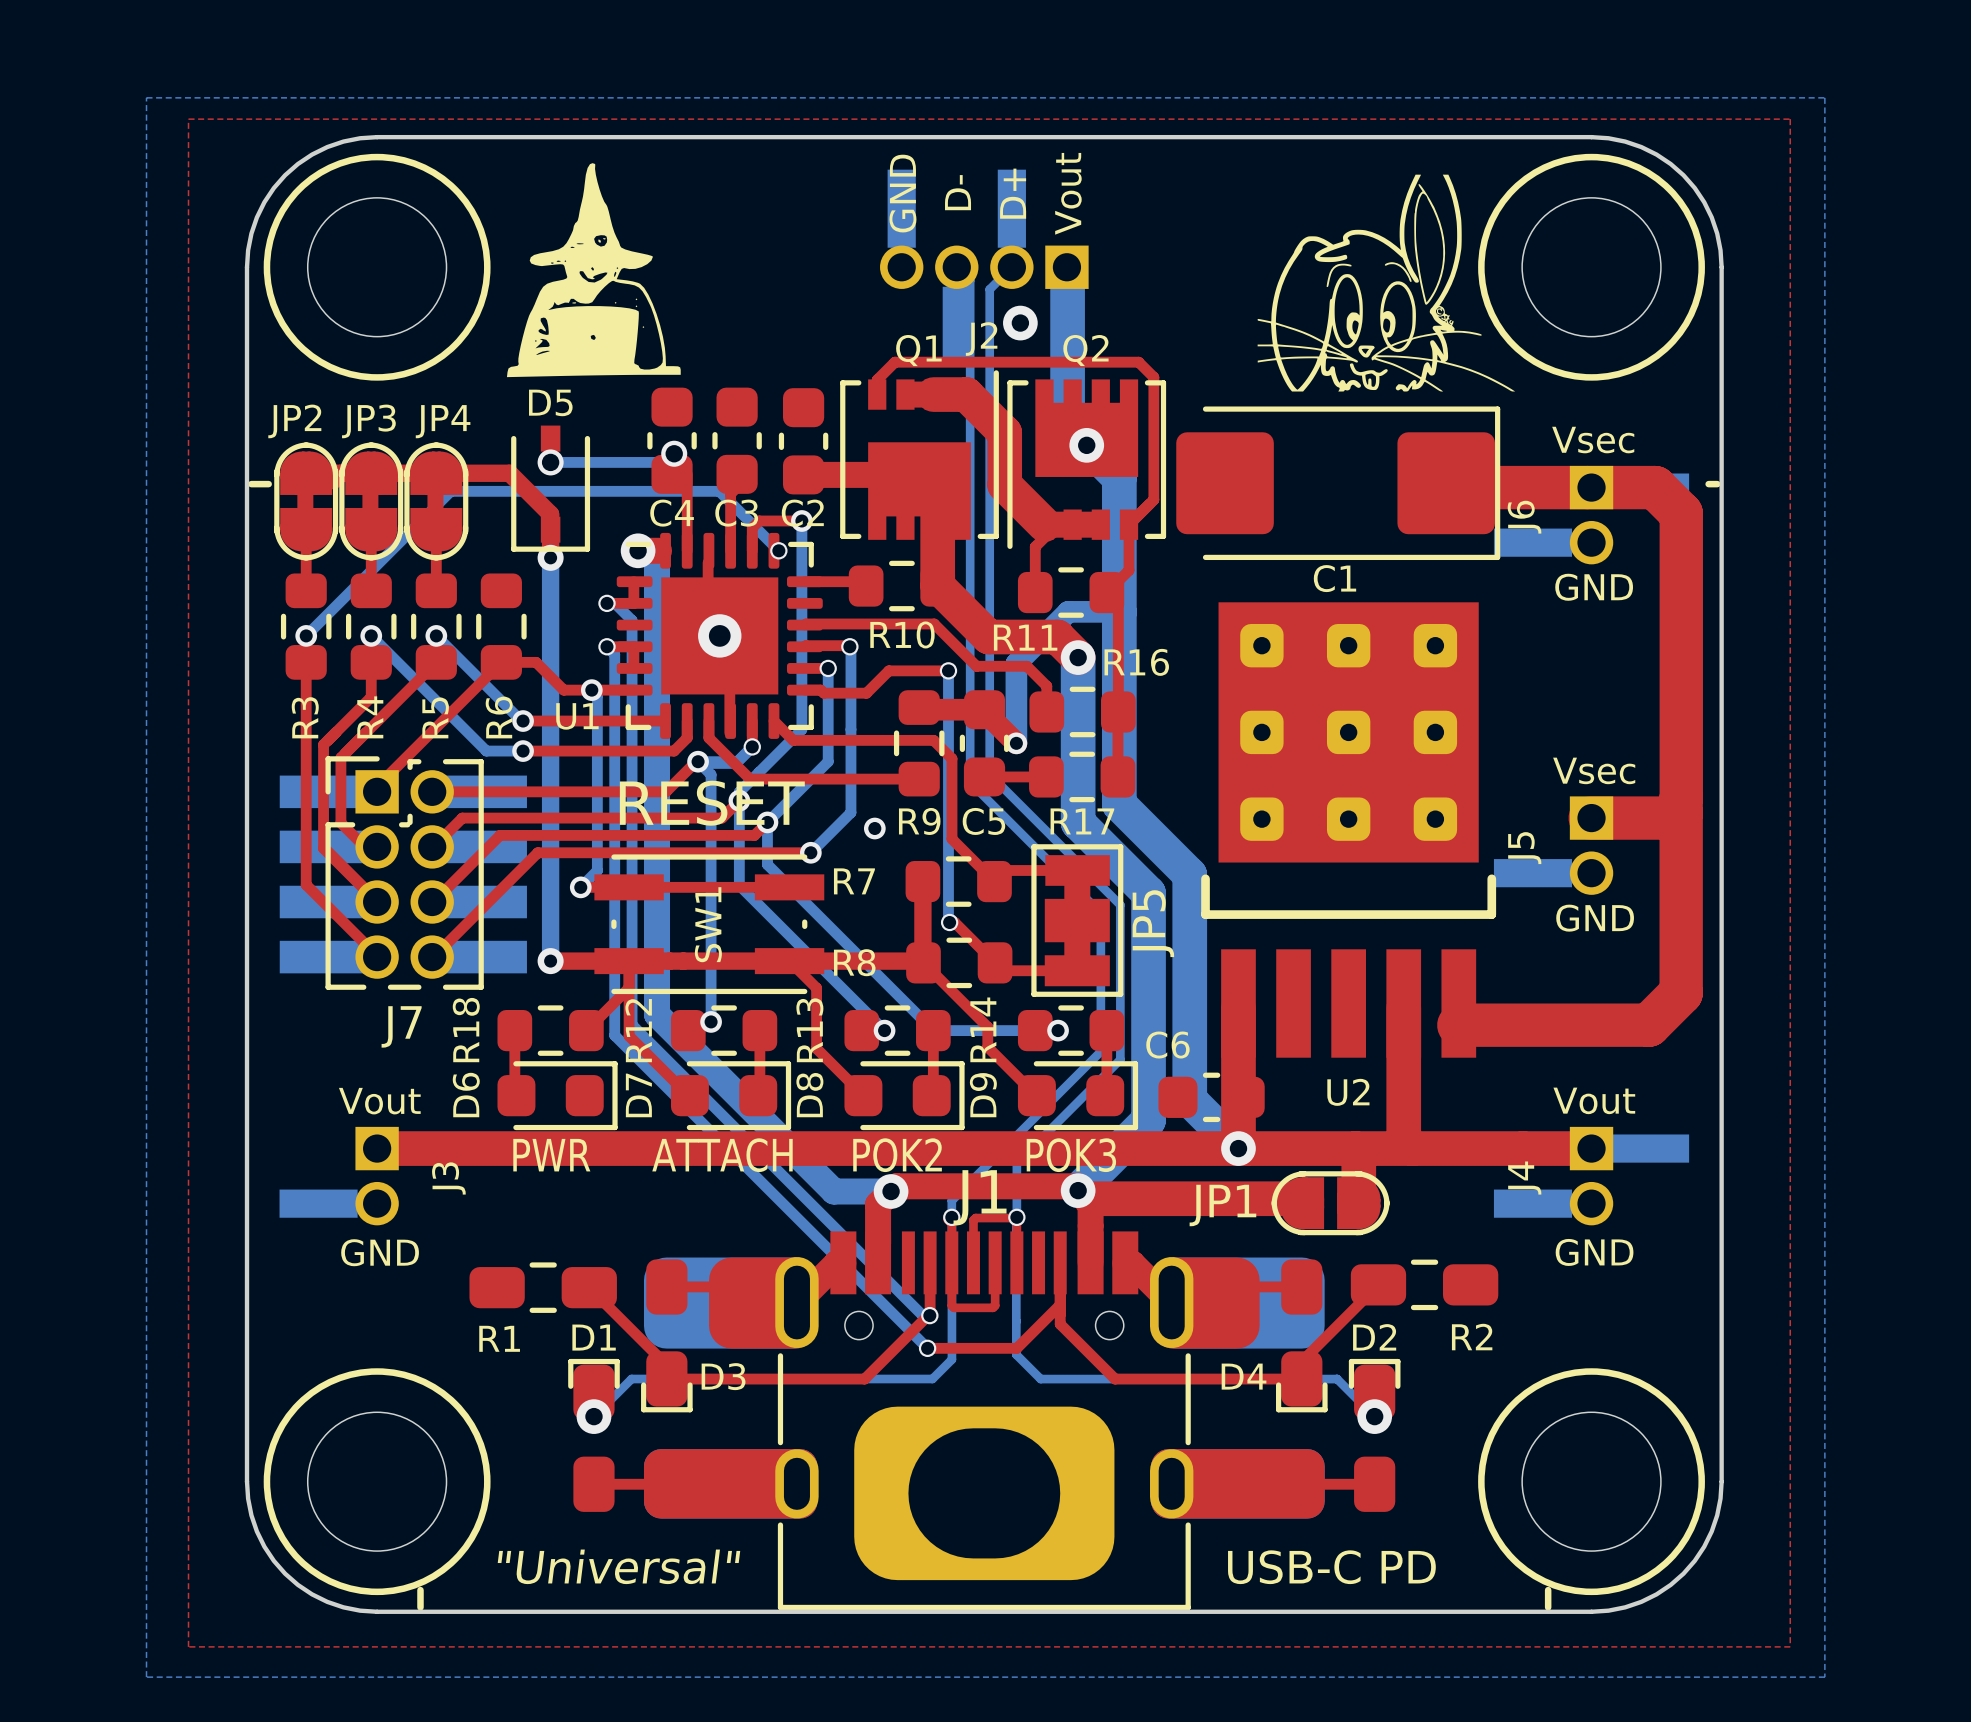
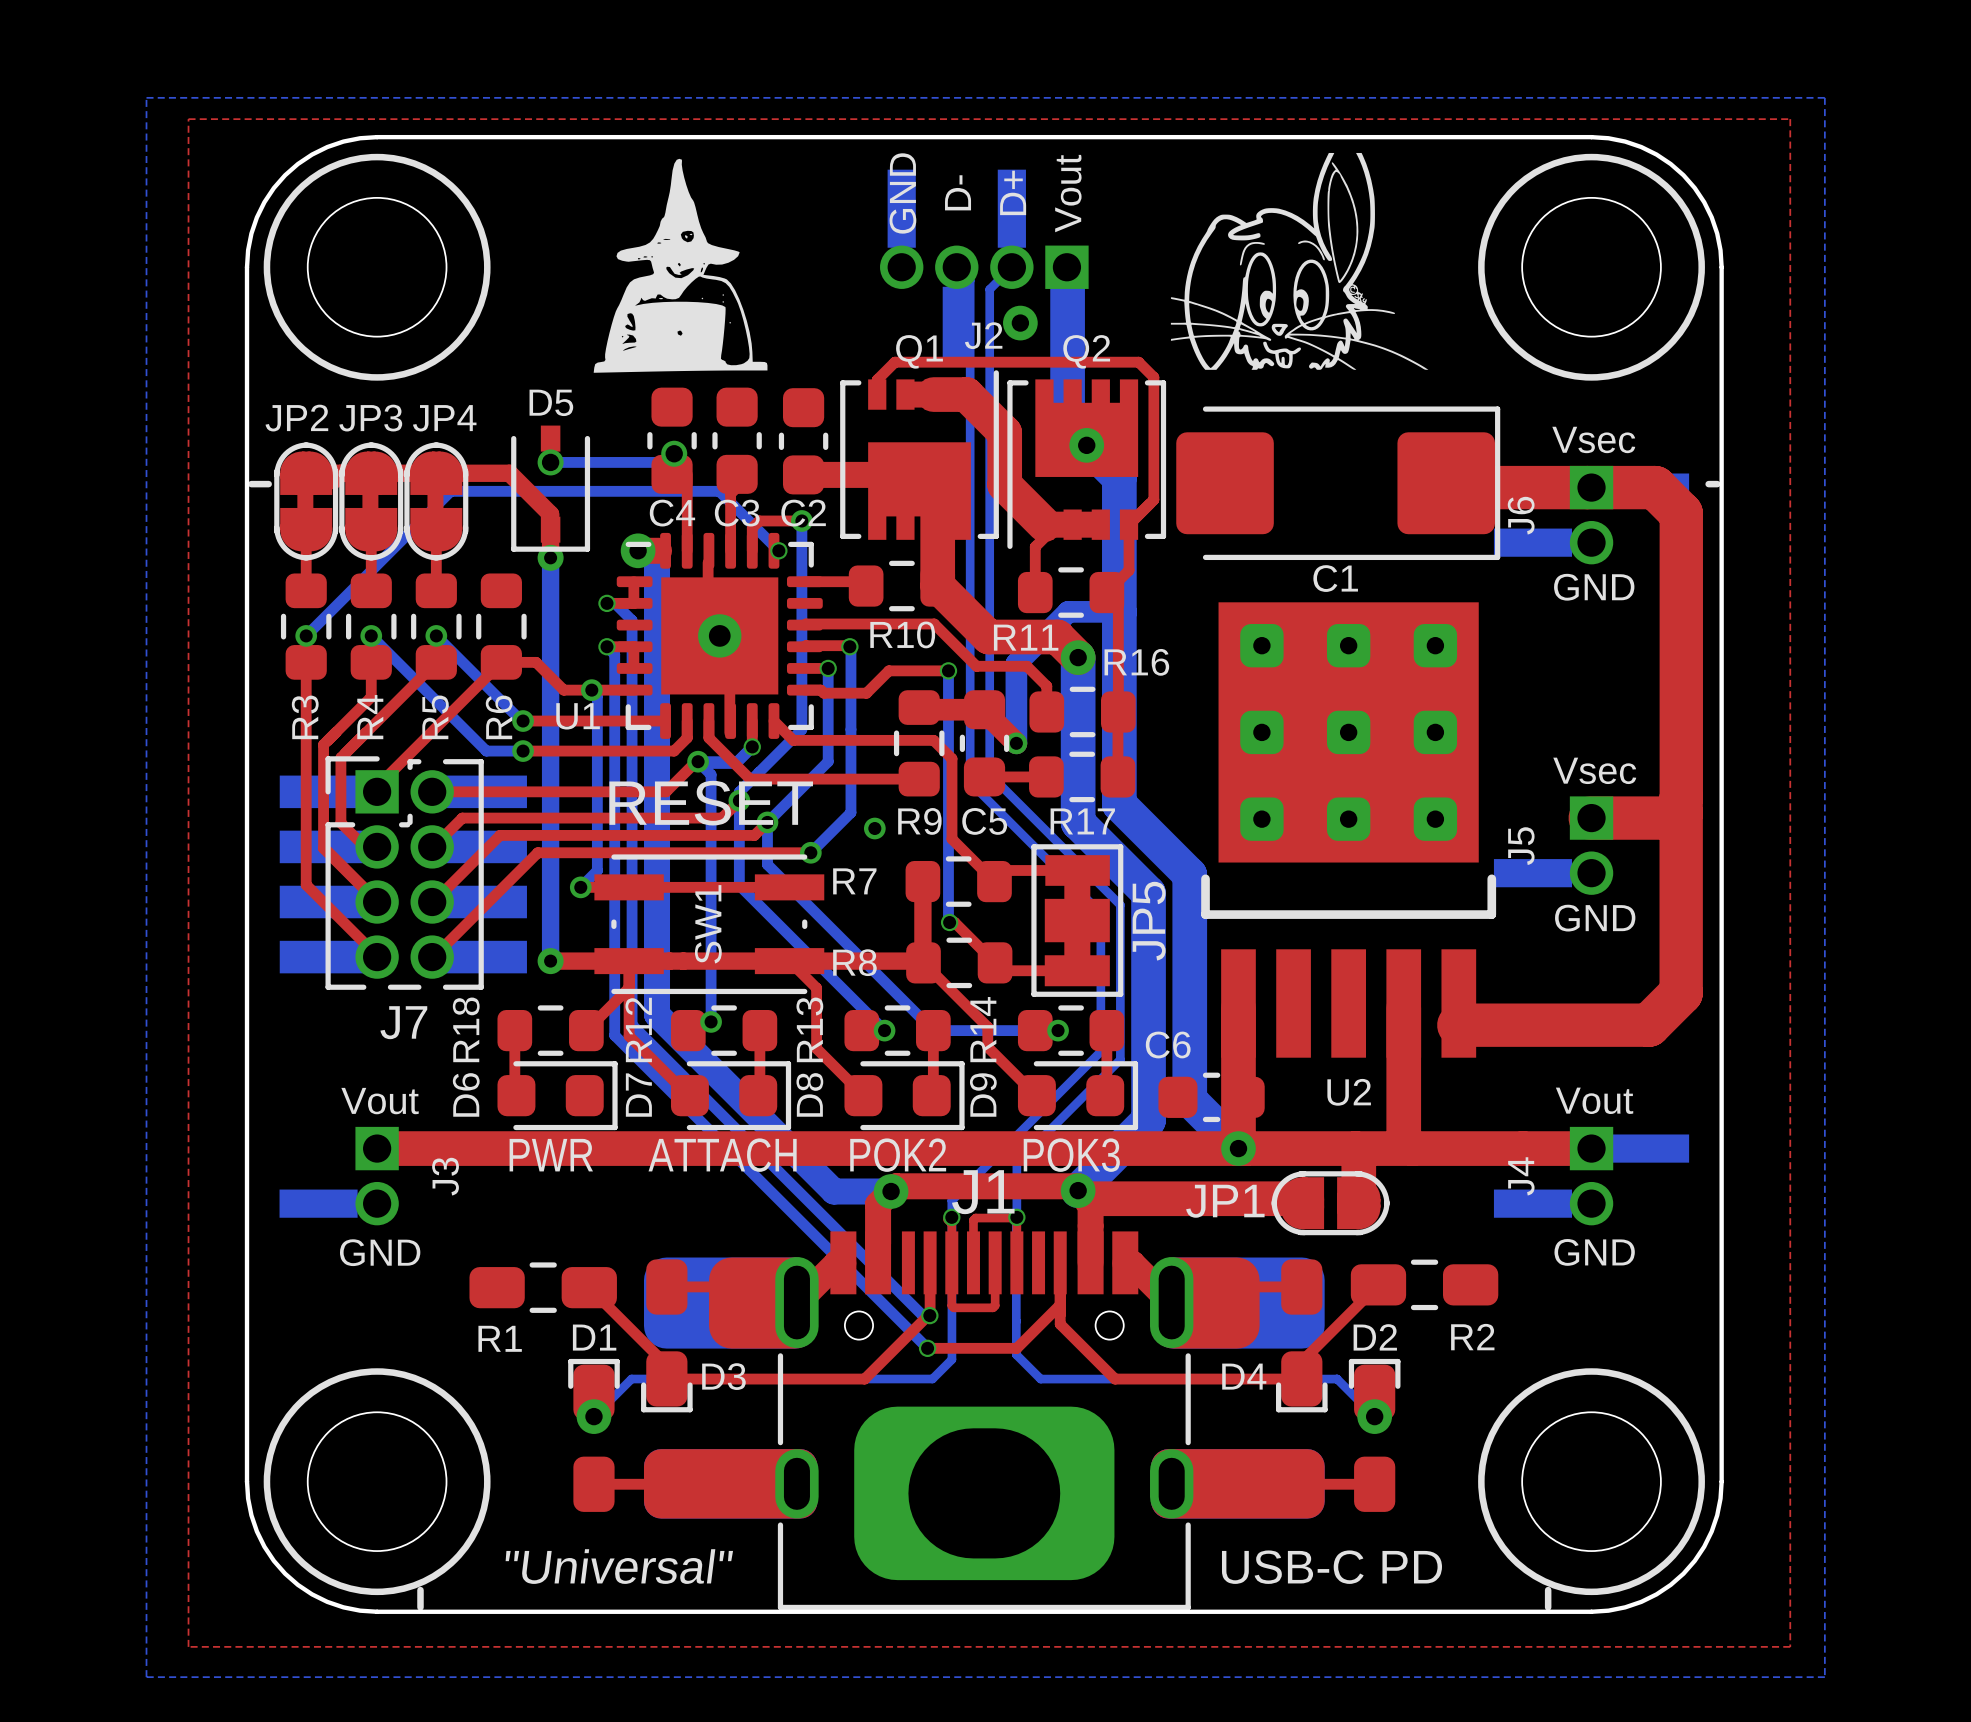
drawing position: (593, 270) -> (680, 265)
drawing position: (1386, 283) -> (1299, 261)

